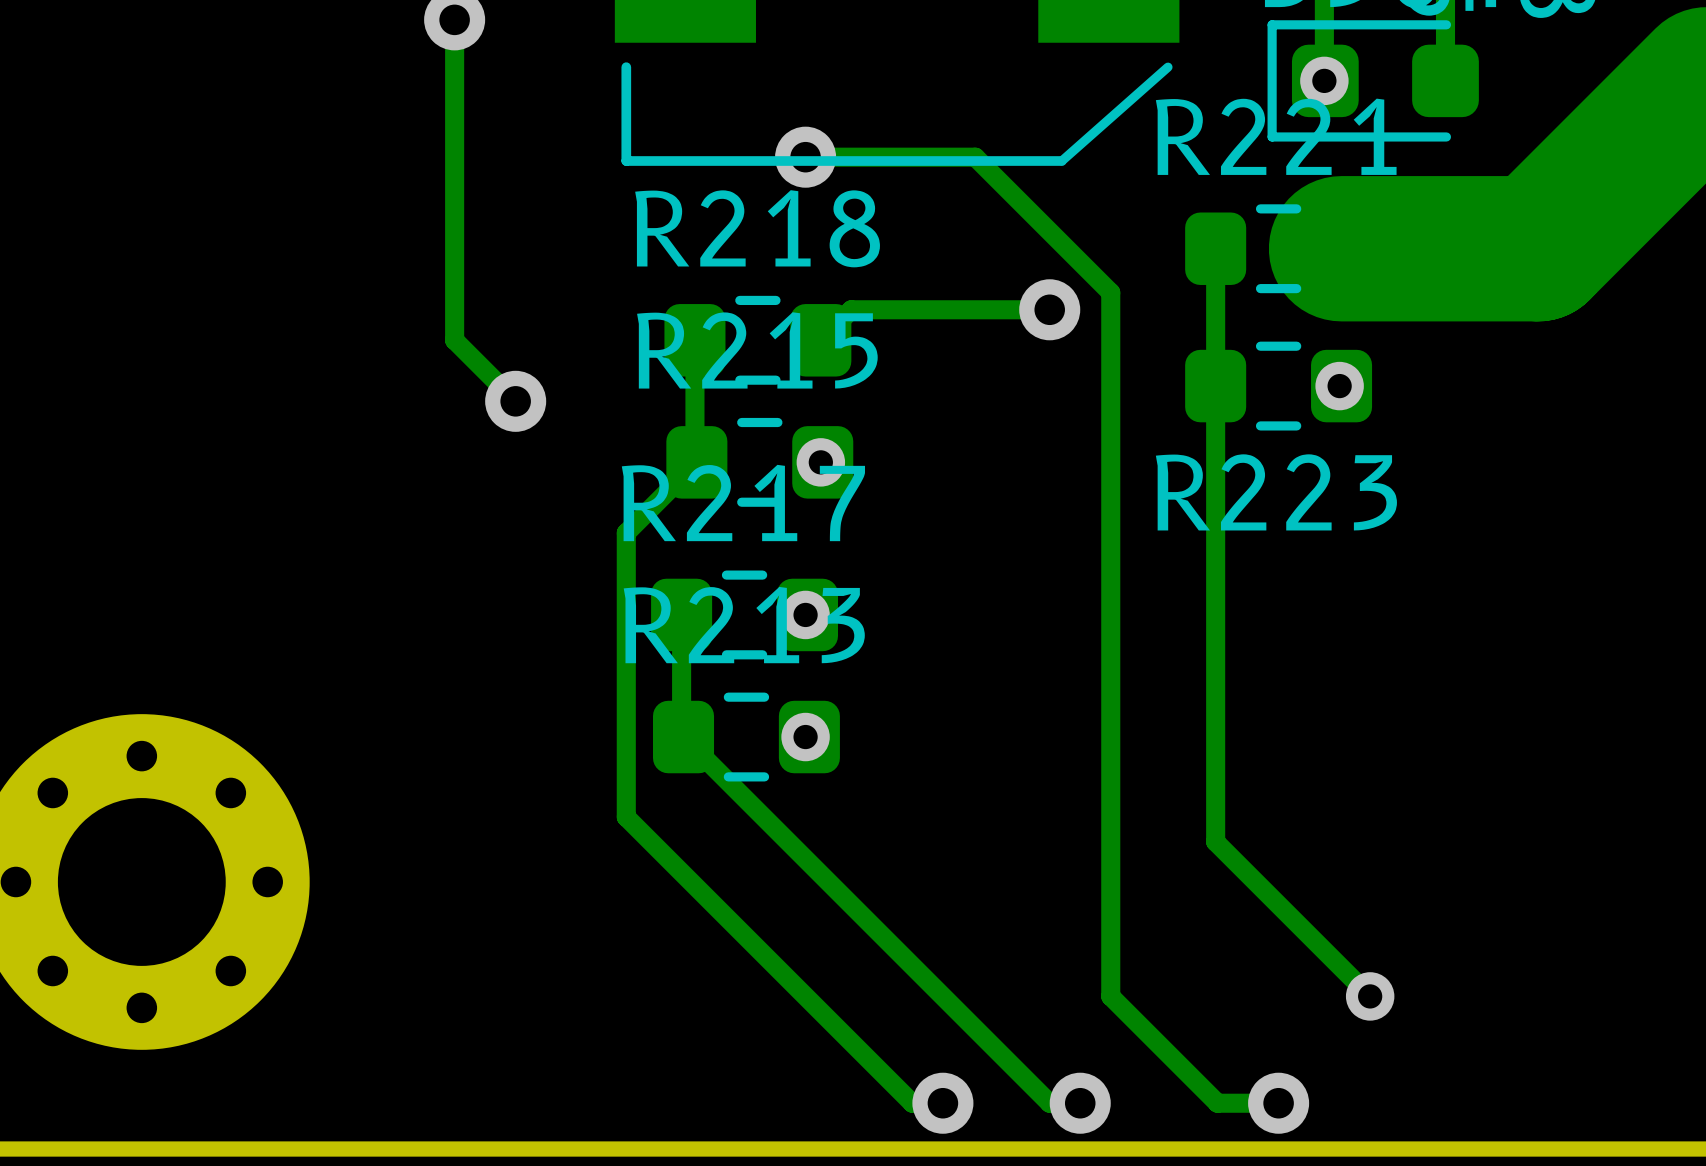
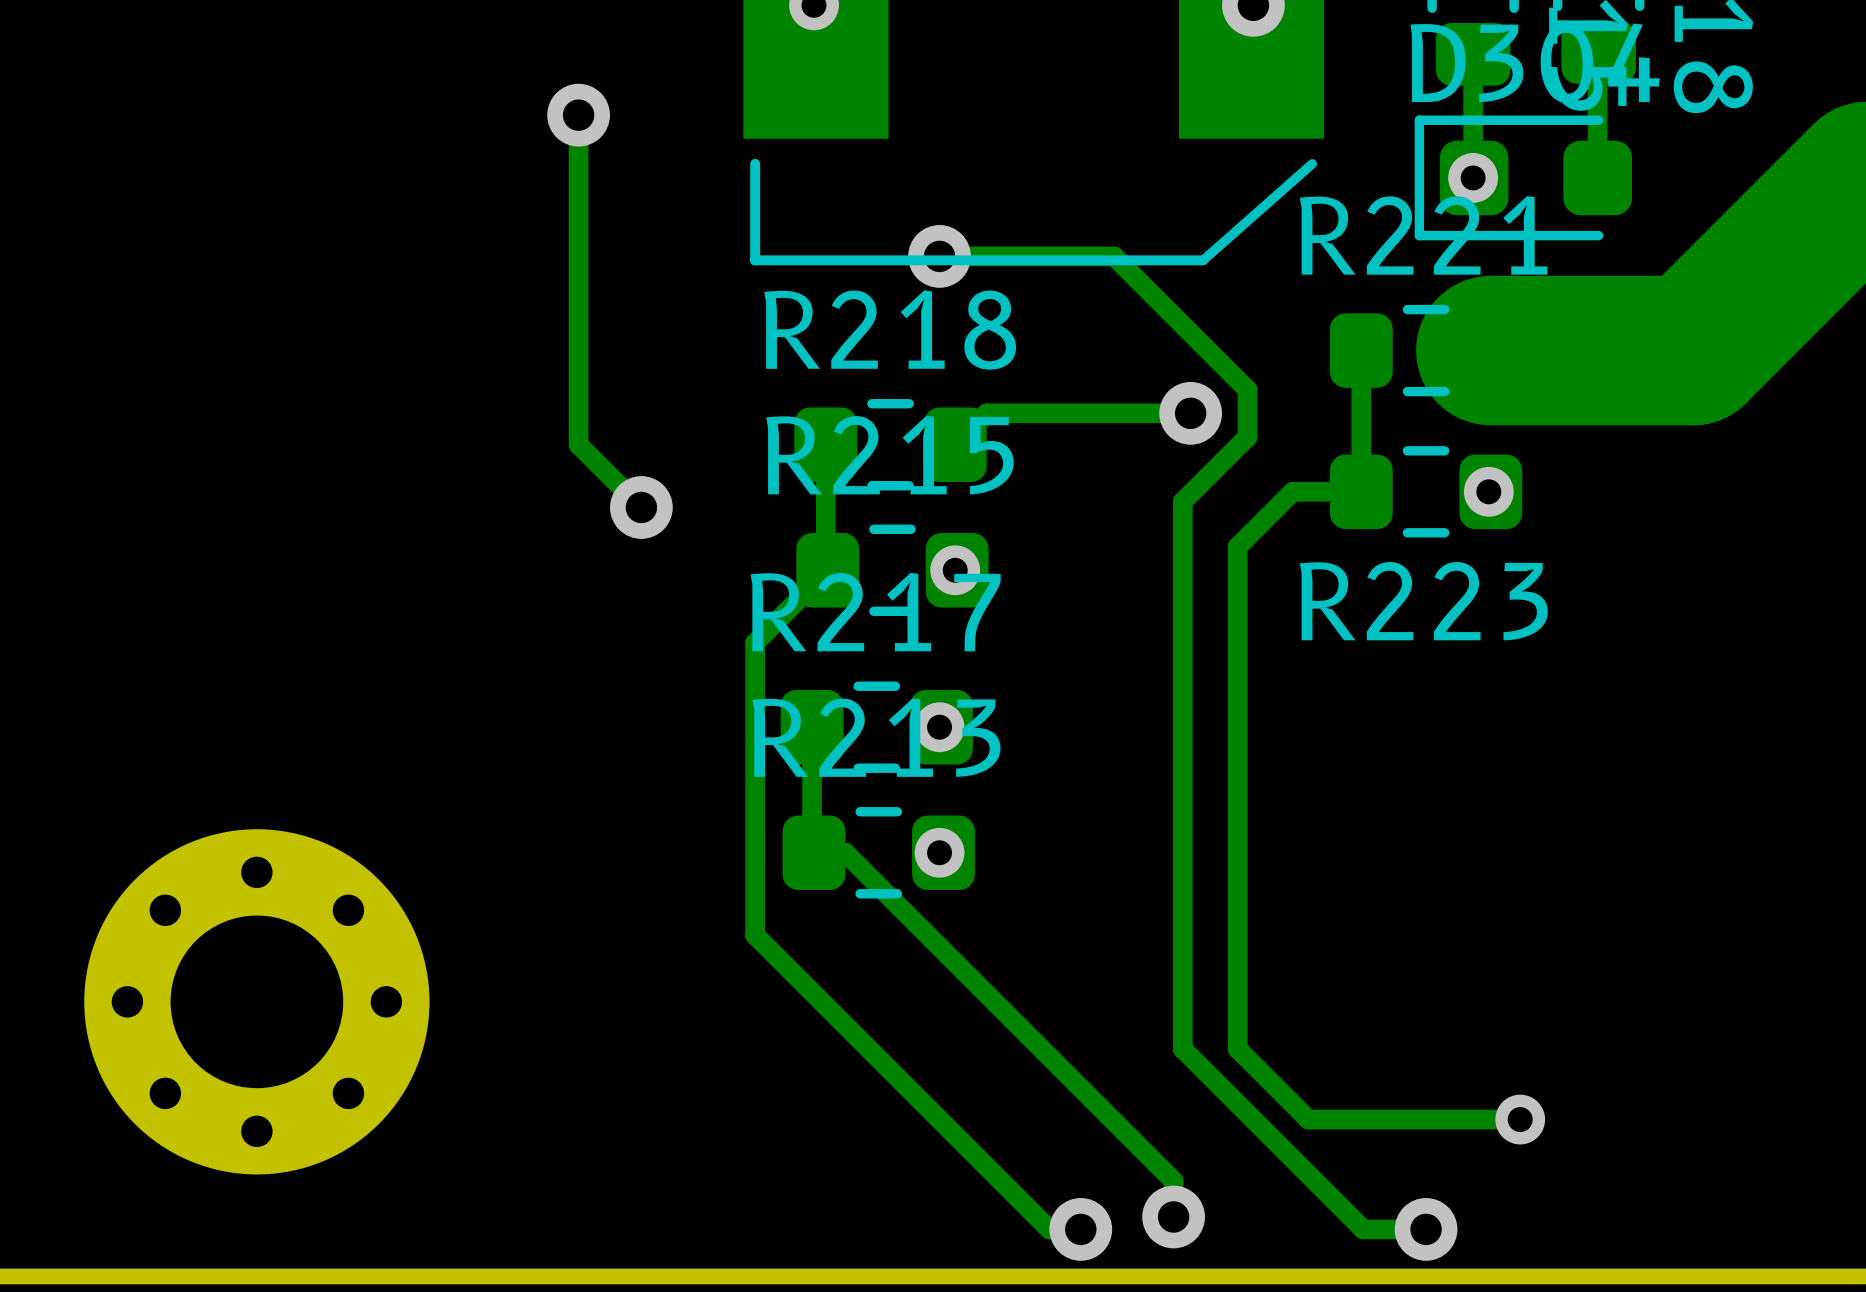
track: (1105, 286) (1110, 292) (1110, 996) -> (1247, 389) (1247, 436) (1182, 501) (1182, 1048) (1253, 1119)
track: (1215, 386) (1215, 841) (1370, 996) -> (1361, 491) (1292, 491) (1237, 546) (1237, 1048) (1308, 1119) (1520, 1119)
track: (683, 737) (1049, 1103) (1080, 1103) -> (814, 852) (845, 852) (1173, 1180) (1173, 1216)
via position: (1080, 1103) -> (1173, 1216)

